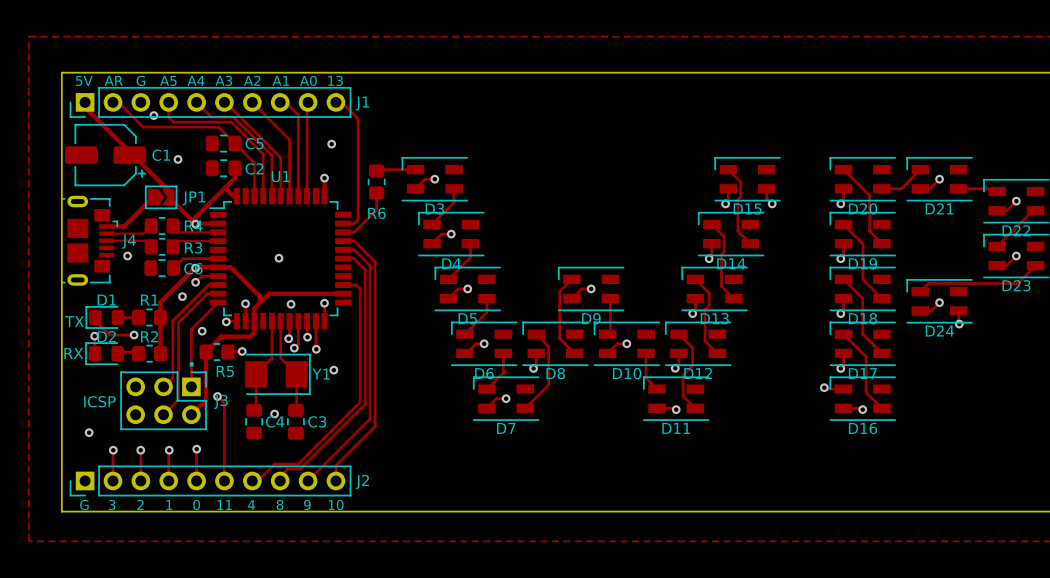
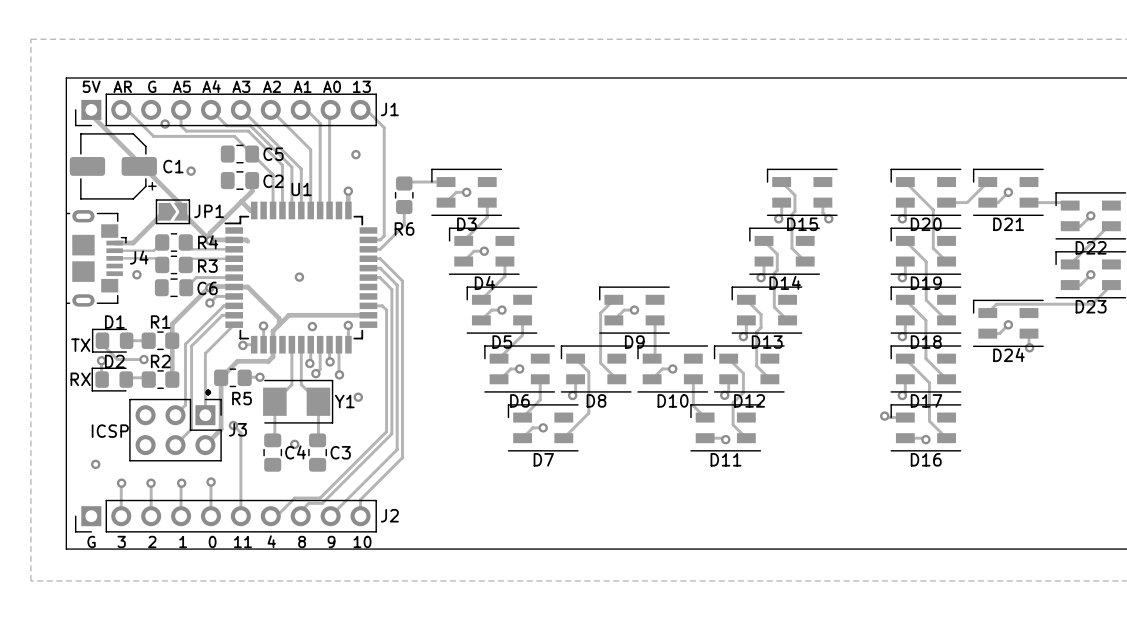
track: none -> (234, 239) (247, 241)
via: (182, 296) -> none
via: (202, 331) -> none

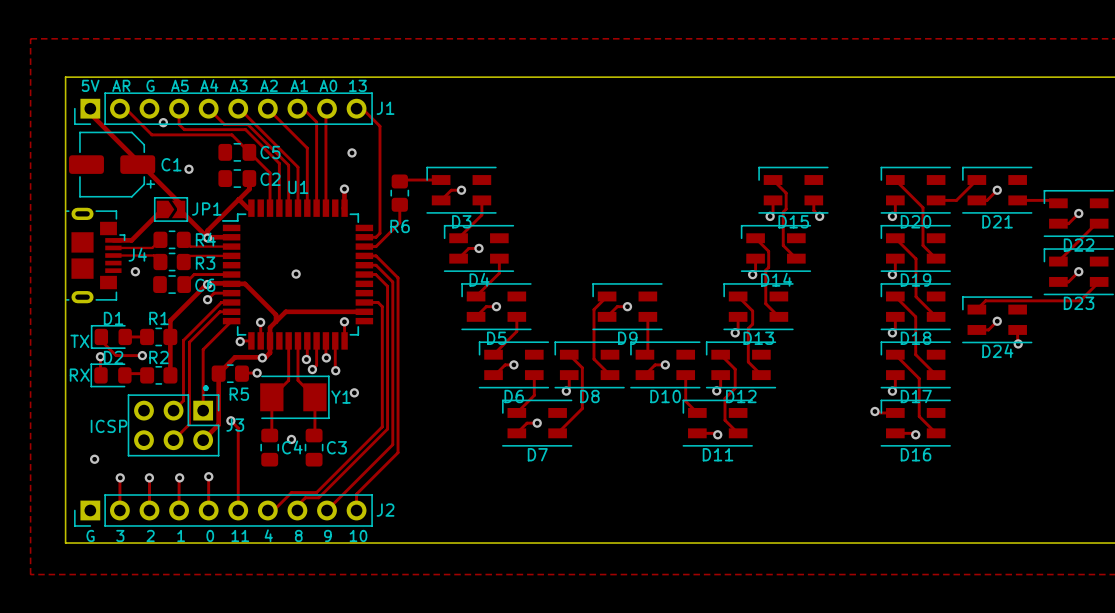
track: (234, 239) (247, 241) -> none
via position: (312, 326) -> (262, 357)

